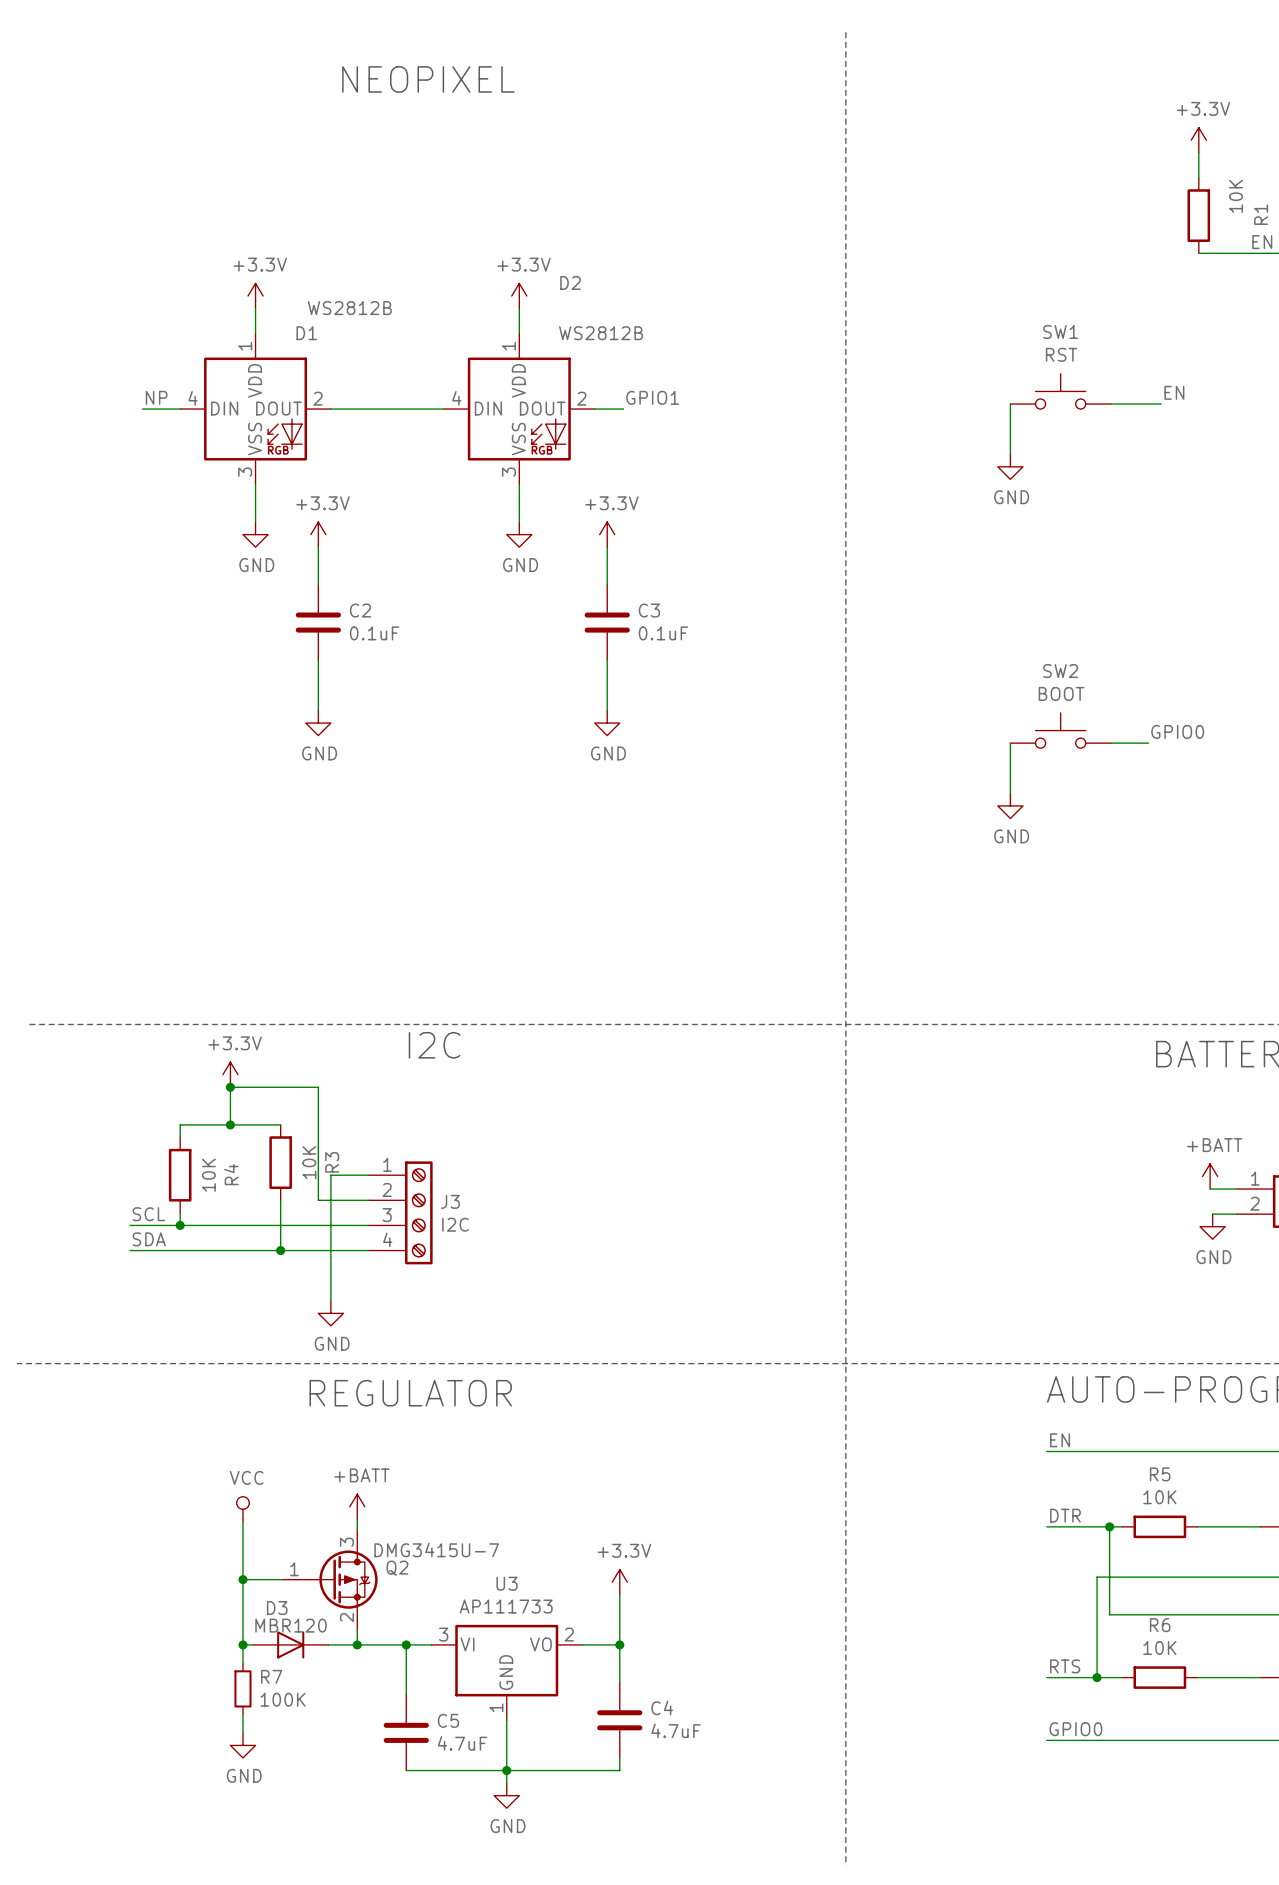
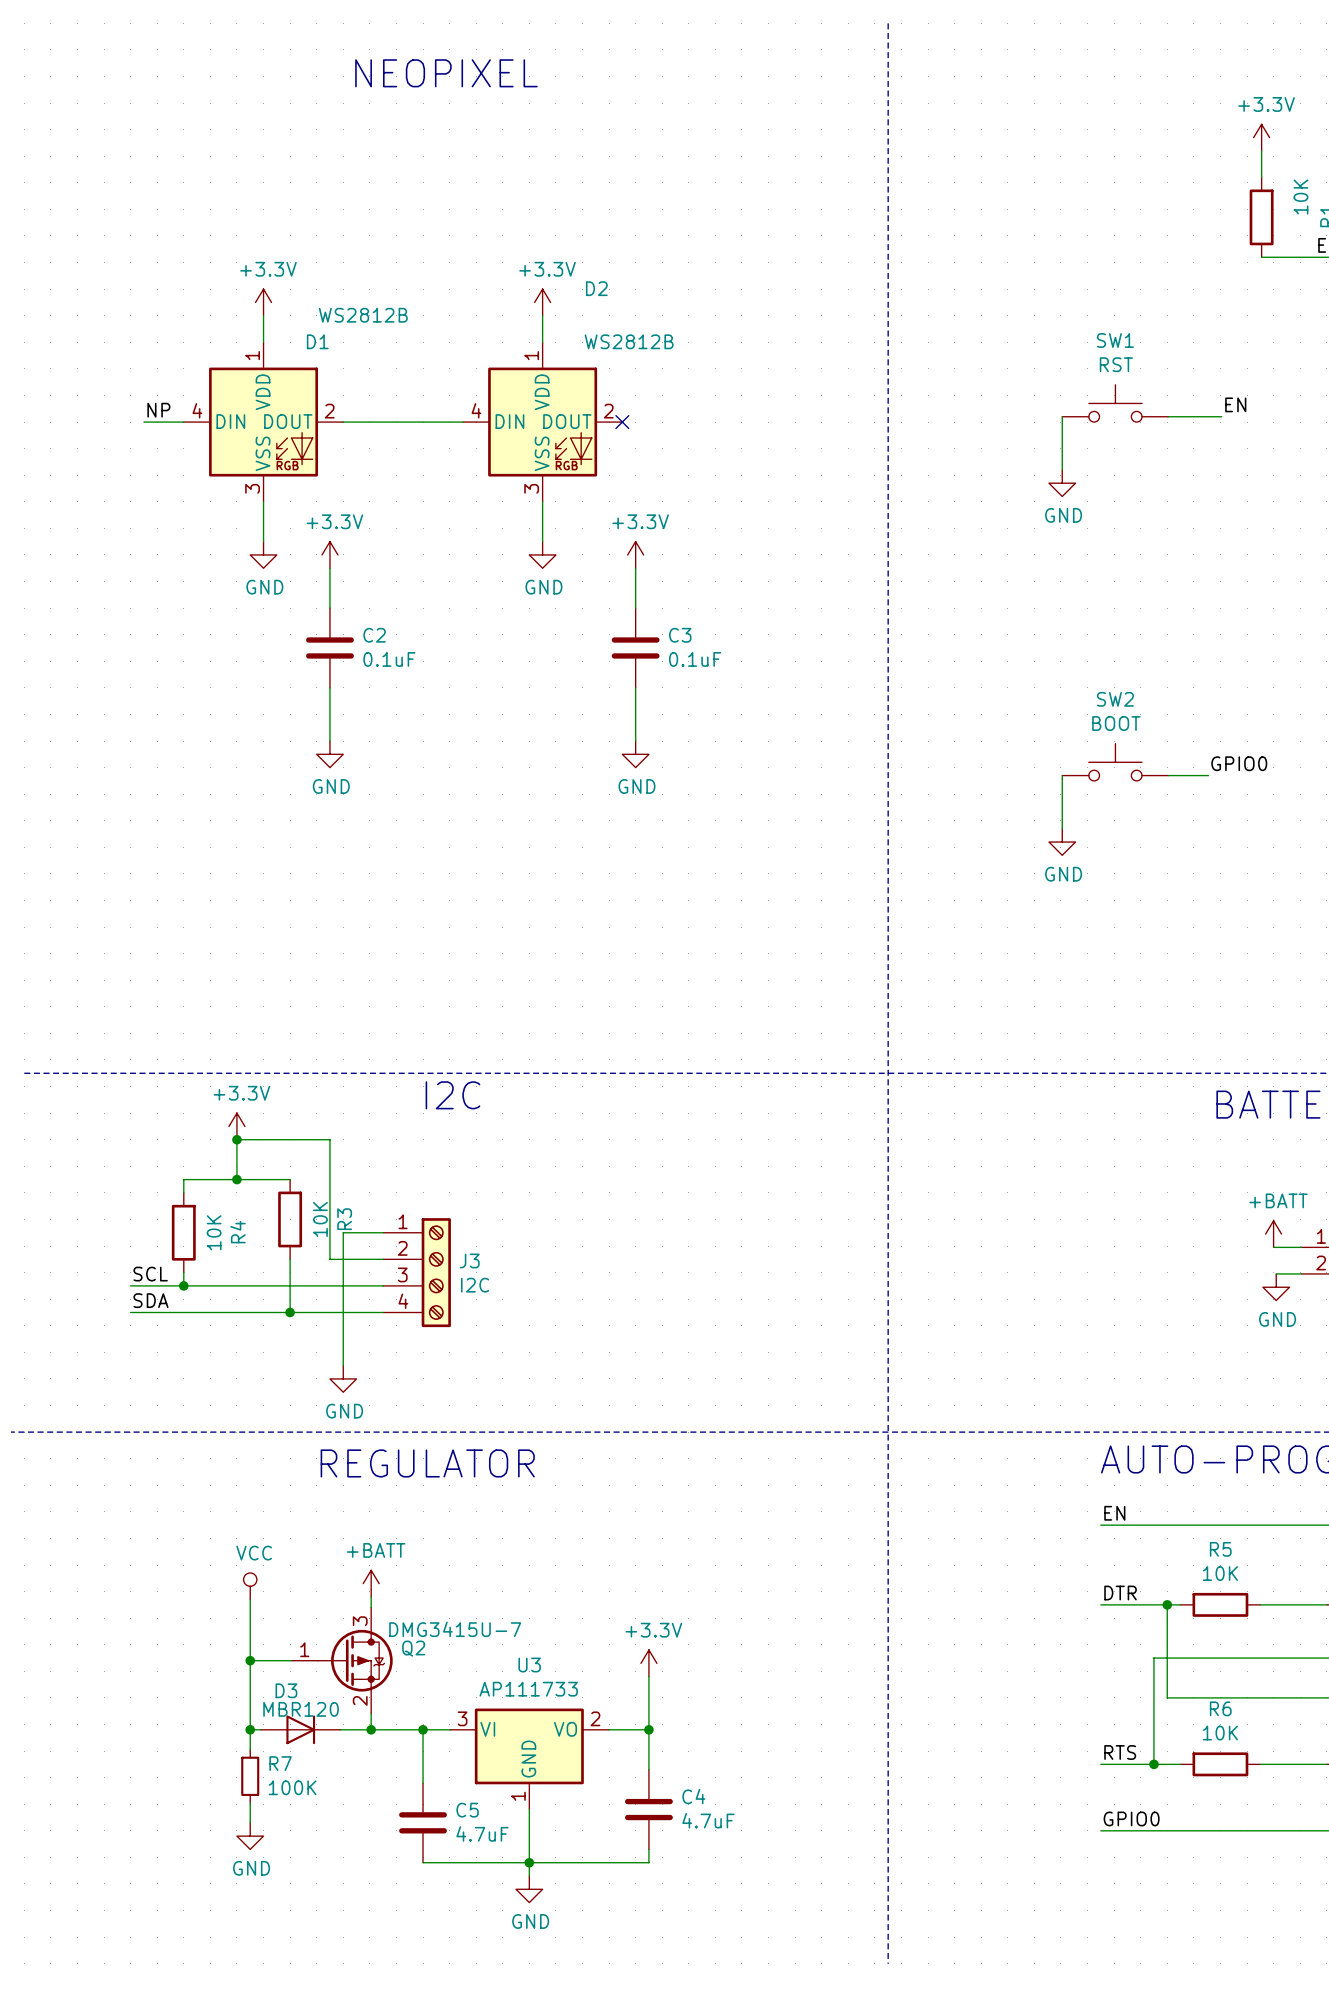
label: GPIO1 (652, 397) -> none
wire: (594, 409) (623, 409) -> none
no-connect mark: none -> (622, 422)

